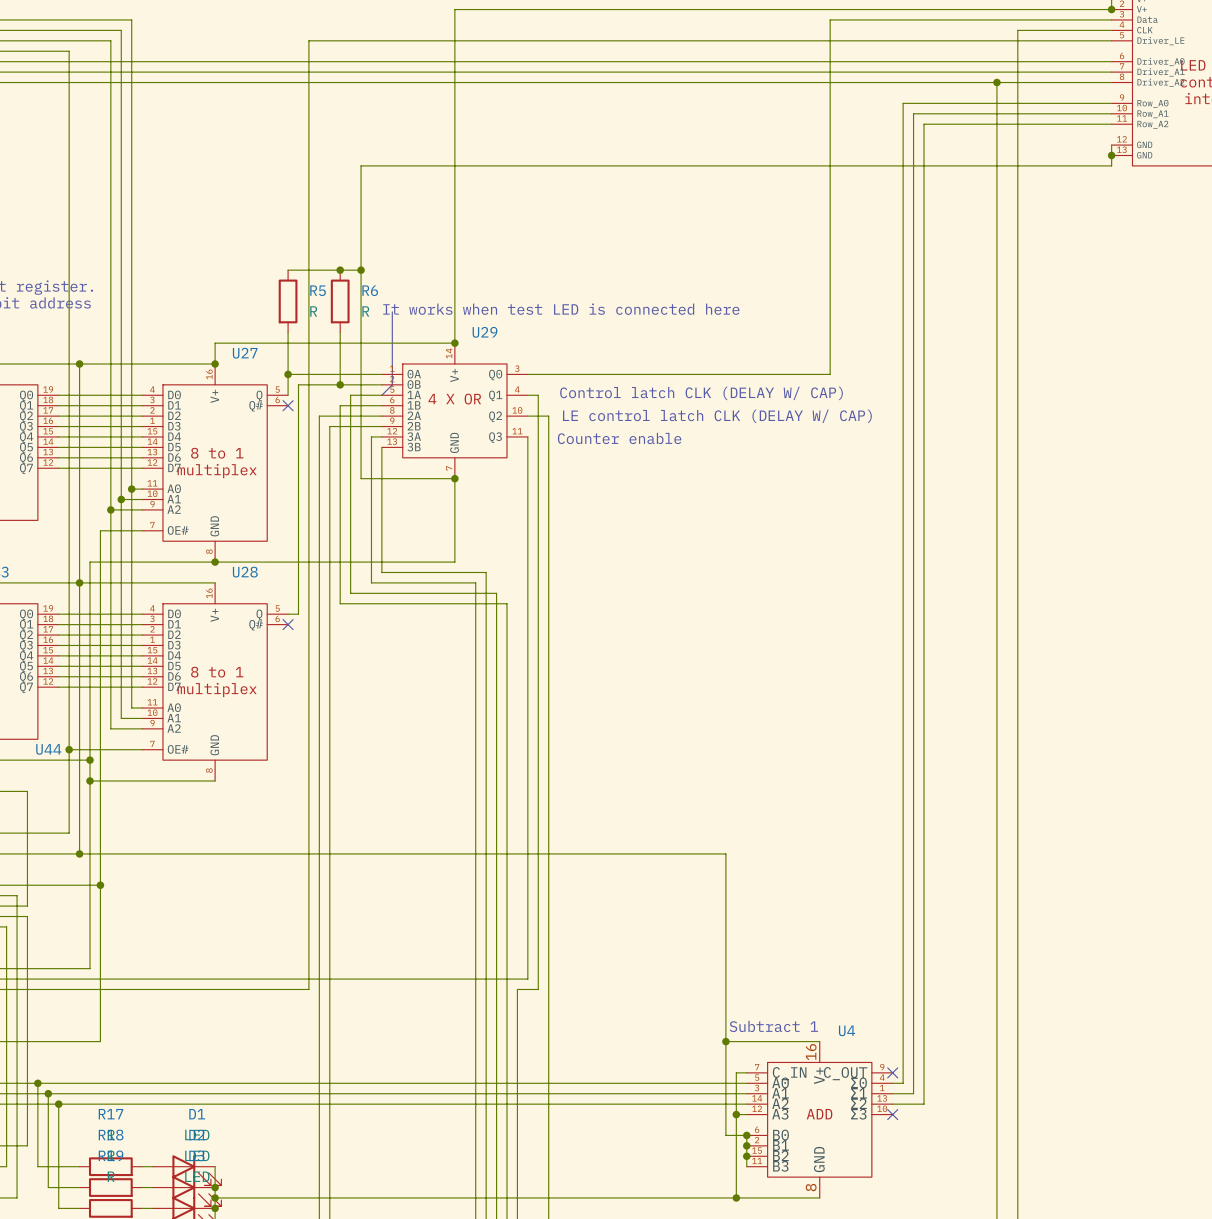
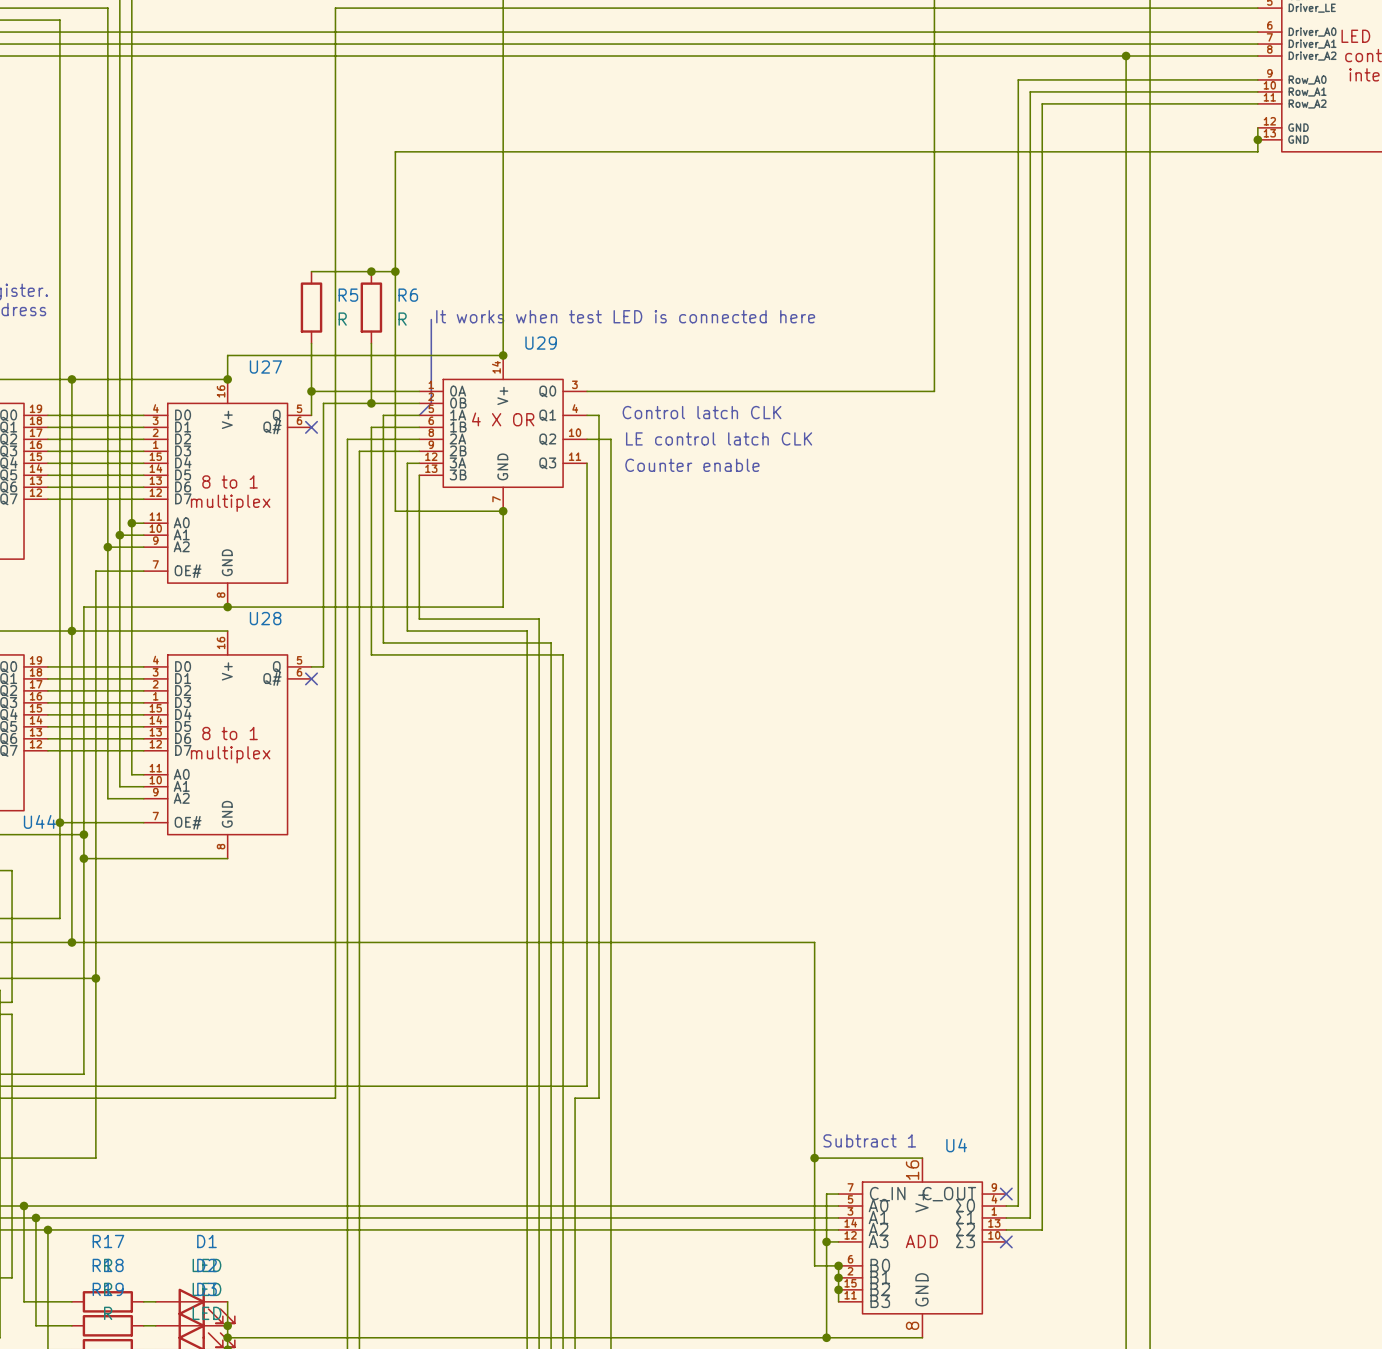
text: Control latch CLK (DELAY W/ CAP) (701, 393) -> Control latch CLK (702, 412)
text: LE control latch CLK (DELAY W/ CAP) (717, 416) -> LE control latch CLK (719, 438)

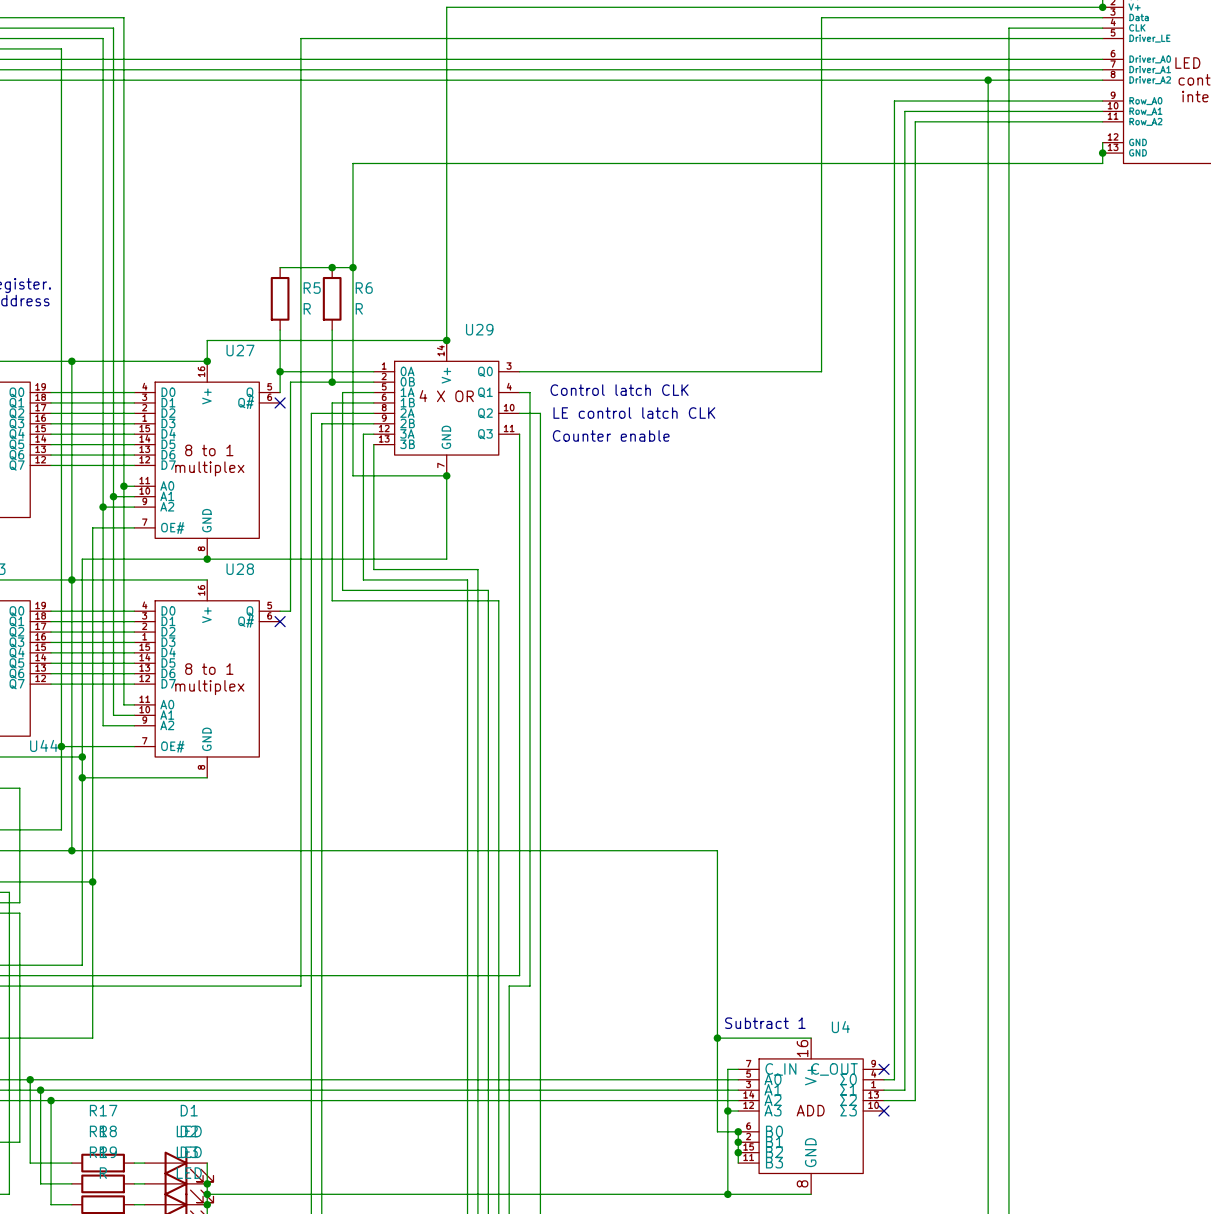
text: It works when test LED is connected here (625, 316) -> none
line: (431, 319) (431, 403) (419, 415) -> none

